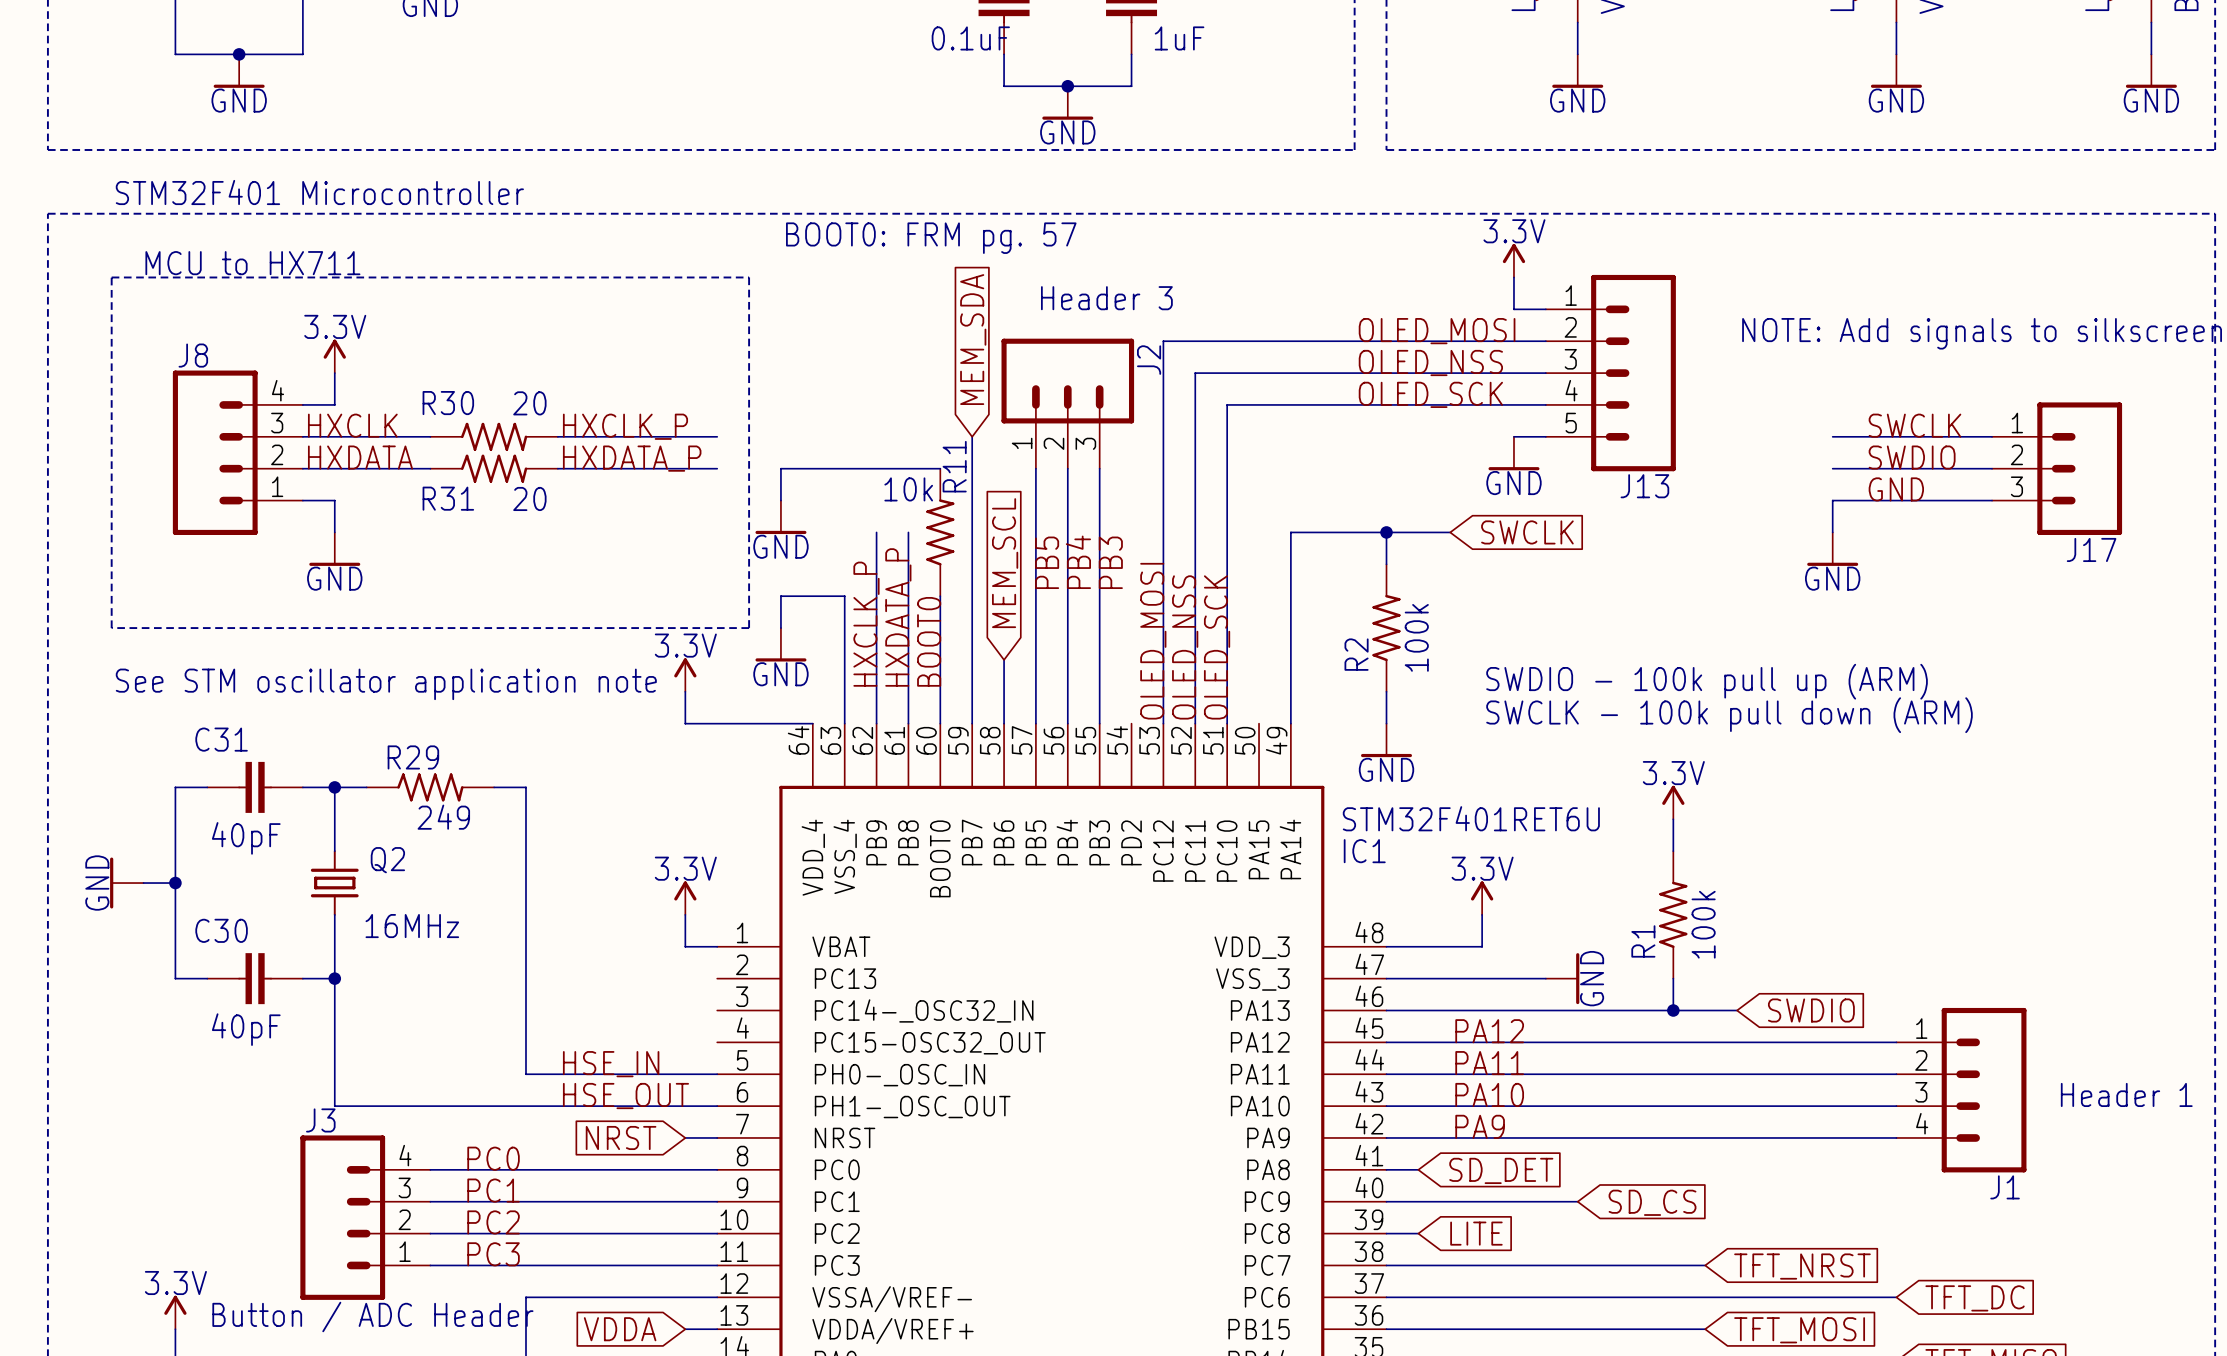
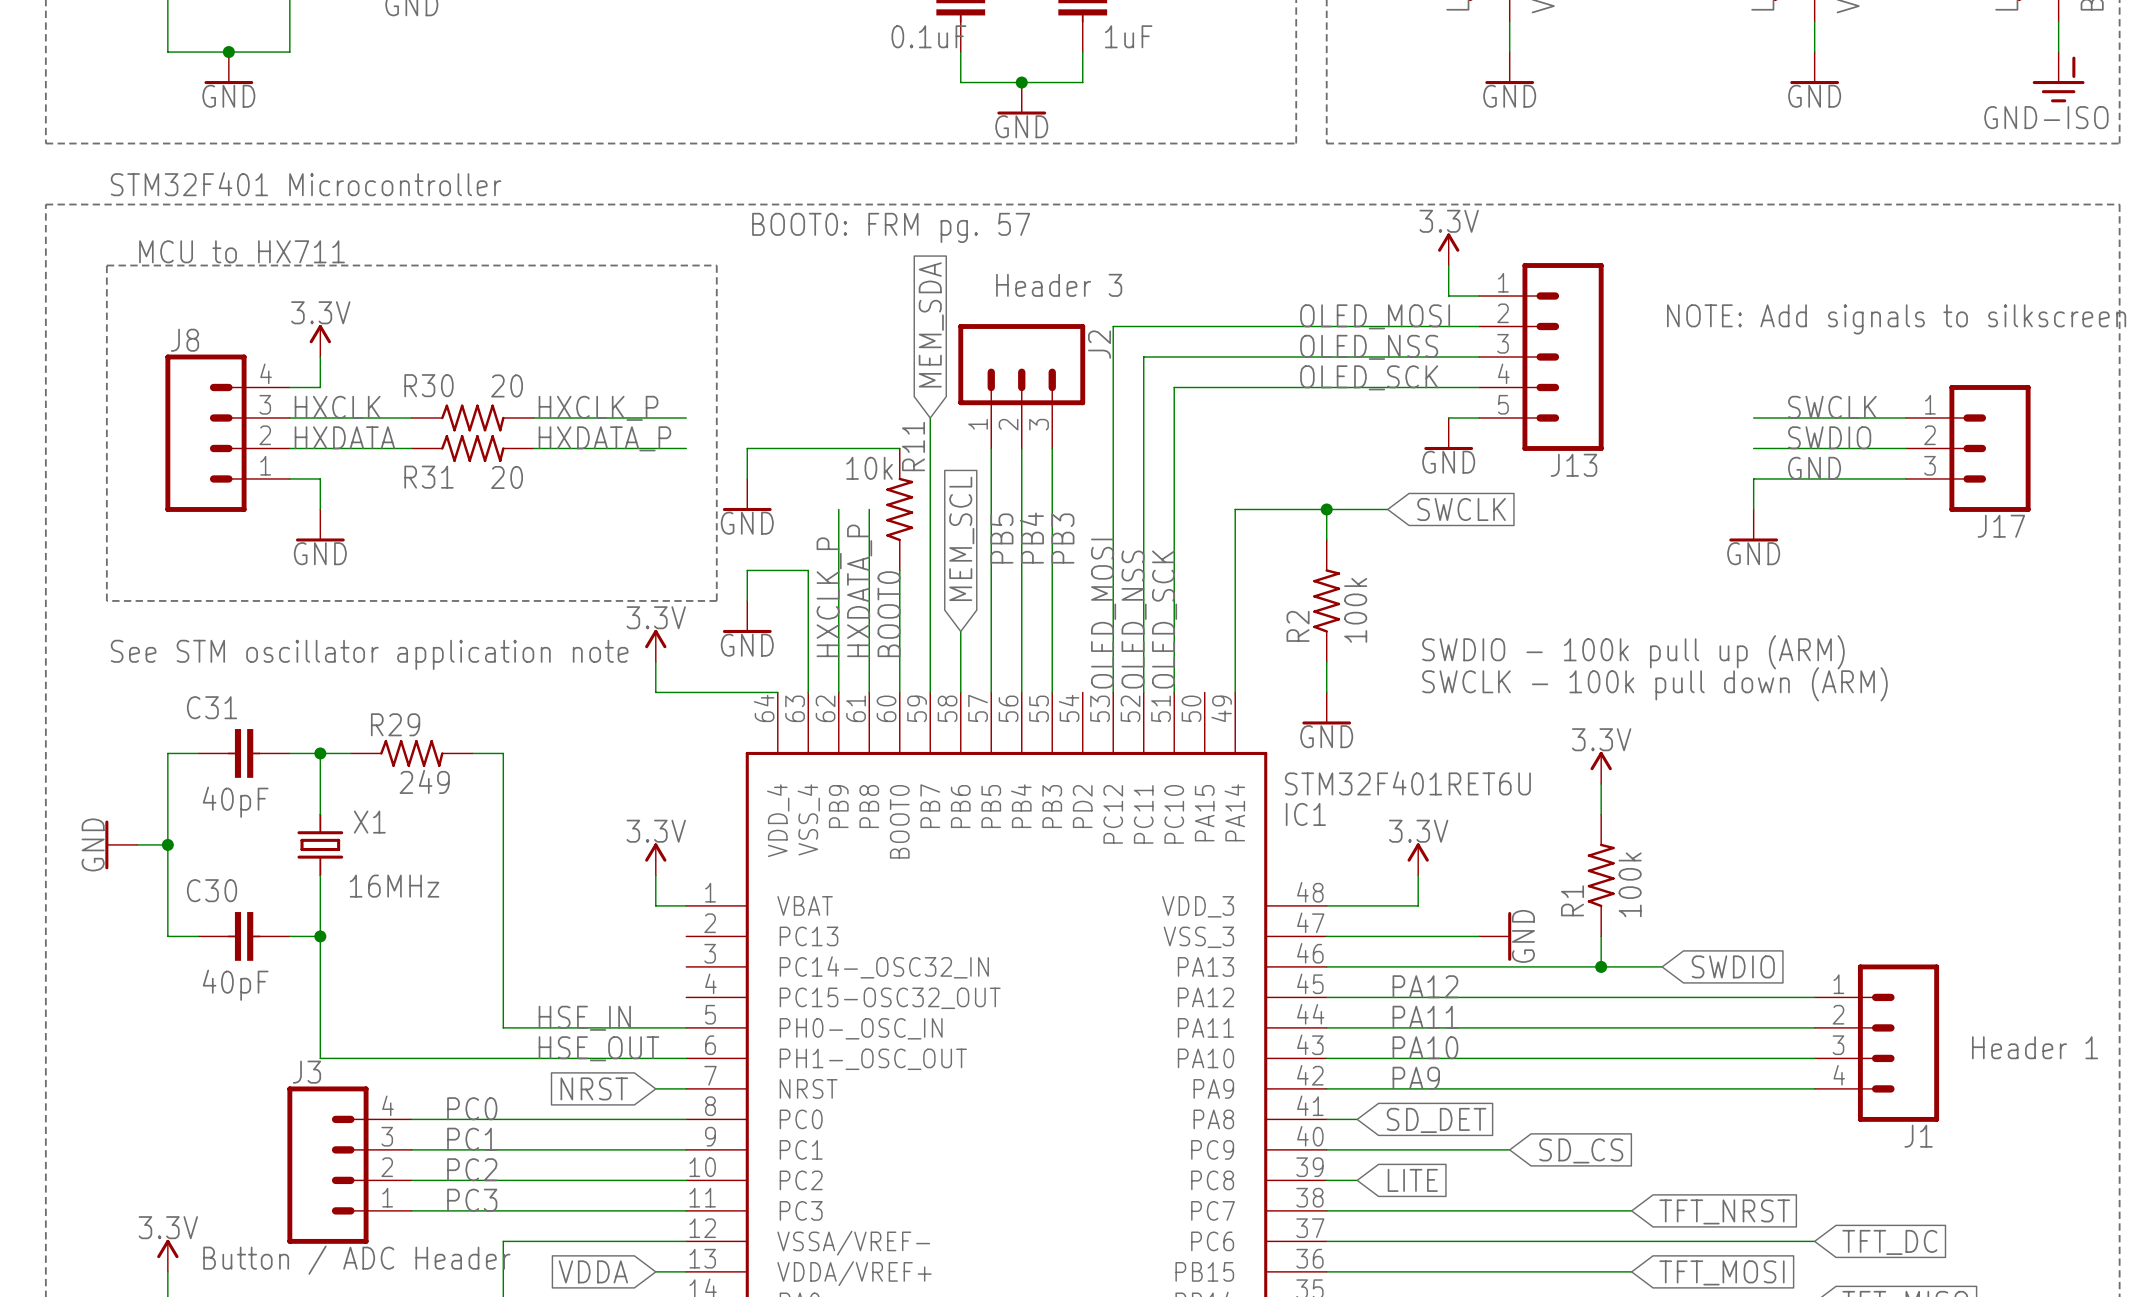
power symbol: GND (2151, 71) -> GND-ISO (2058, 77)
Q2 name: Q2 (387, 860) -> X1 (369, 822)

